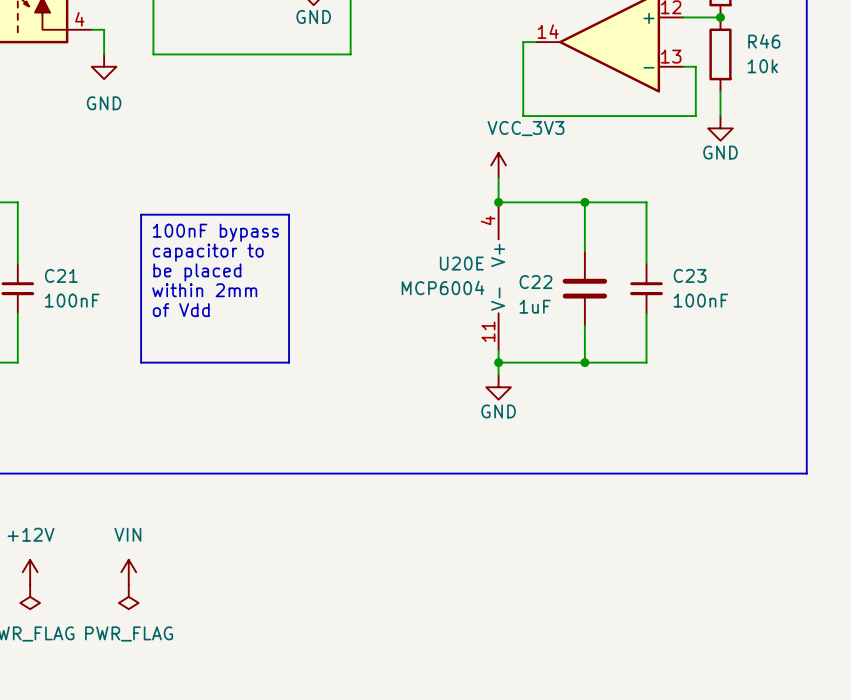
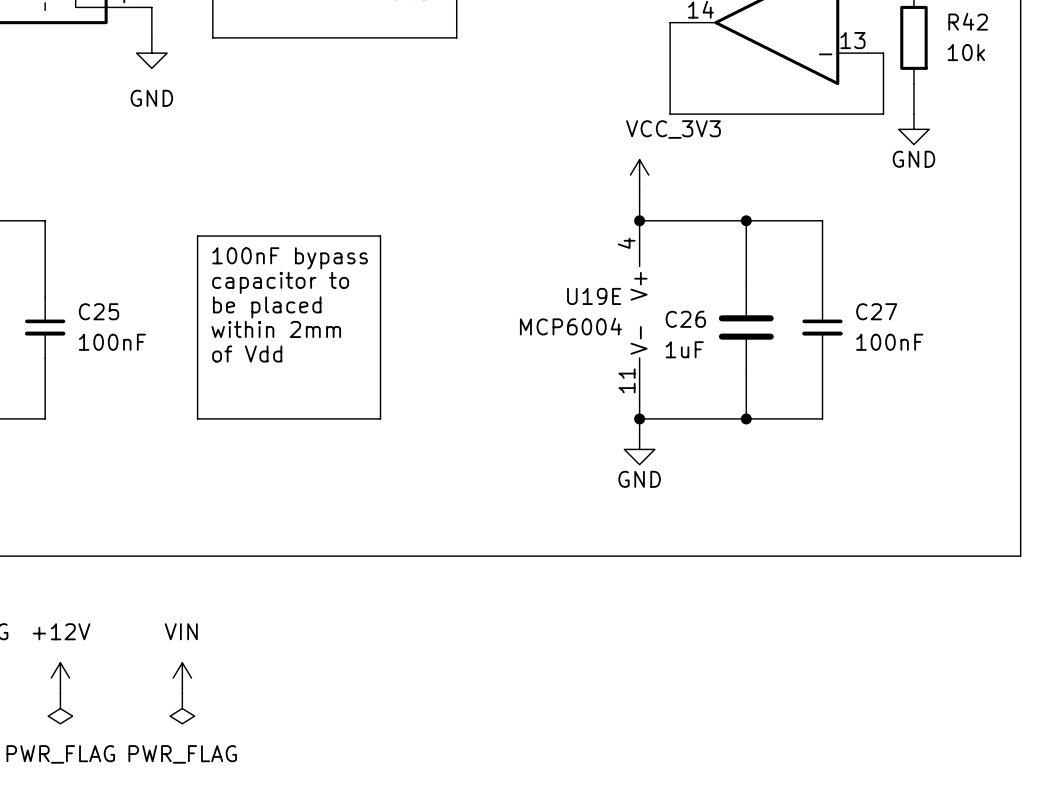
R46 name: R46 (764, 41) -> R42 (968, 21)
U20E name: U20E (461, 263) -> U19E (594, 296)
C21 name: C21 (61, 275) -> C25 (98, 311)
C23 name: C23 (690, 275) -> C27 (876, 311)
C22 name: C22 (535, 282) -> C26 (685, 319)

